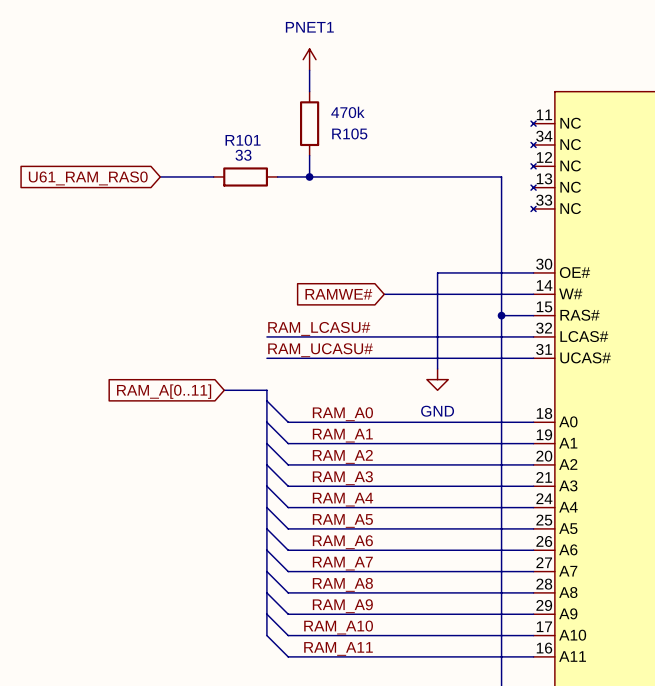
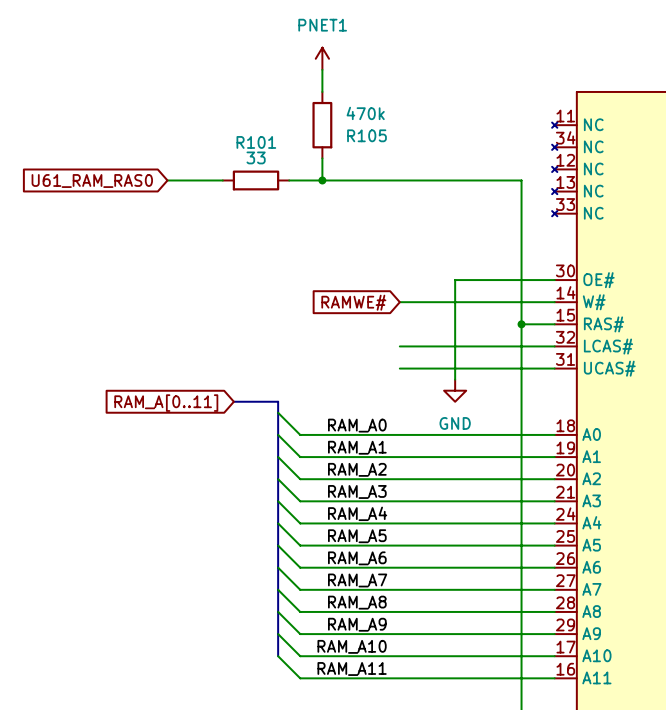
label: RAM_LCASU# (319, 328) -> none
wire: (266, 336) (384, 336) -> none
label: RAM_UCASU# (320, 350) -> none
wire: (266, 358) (384, 358) -> none

